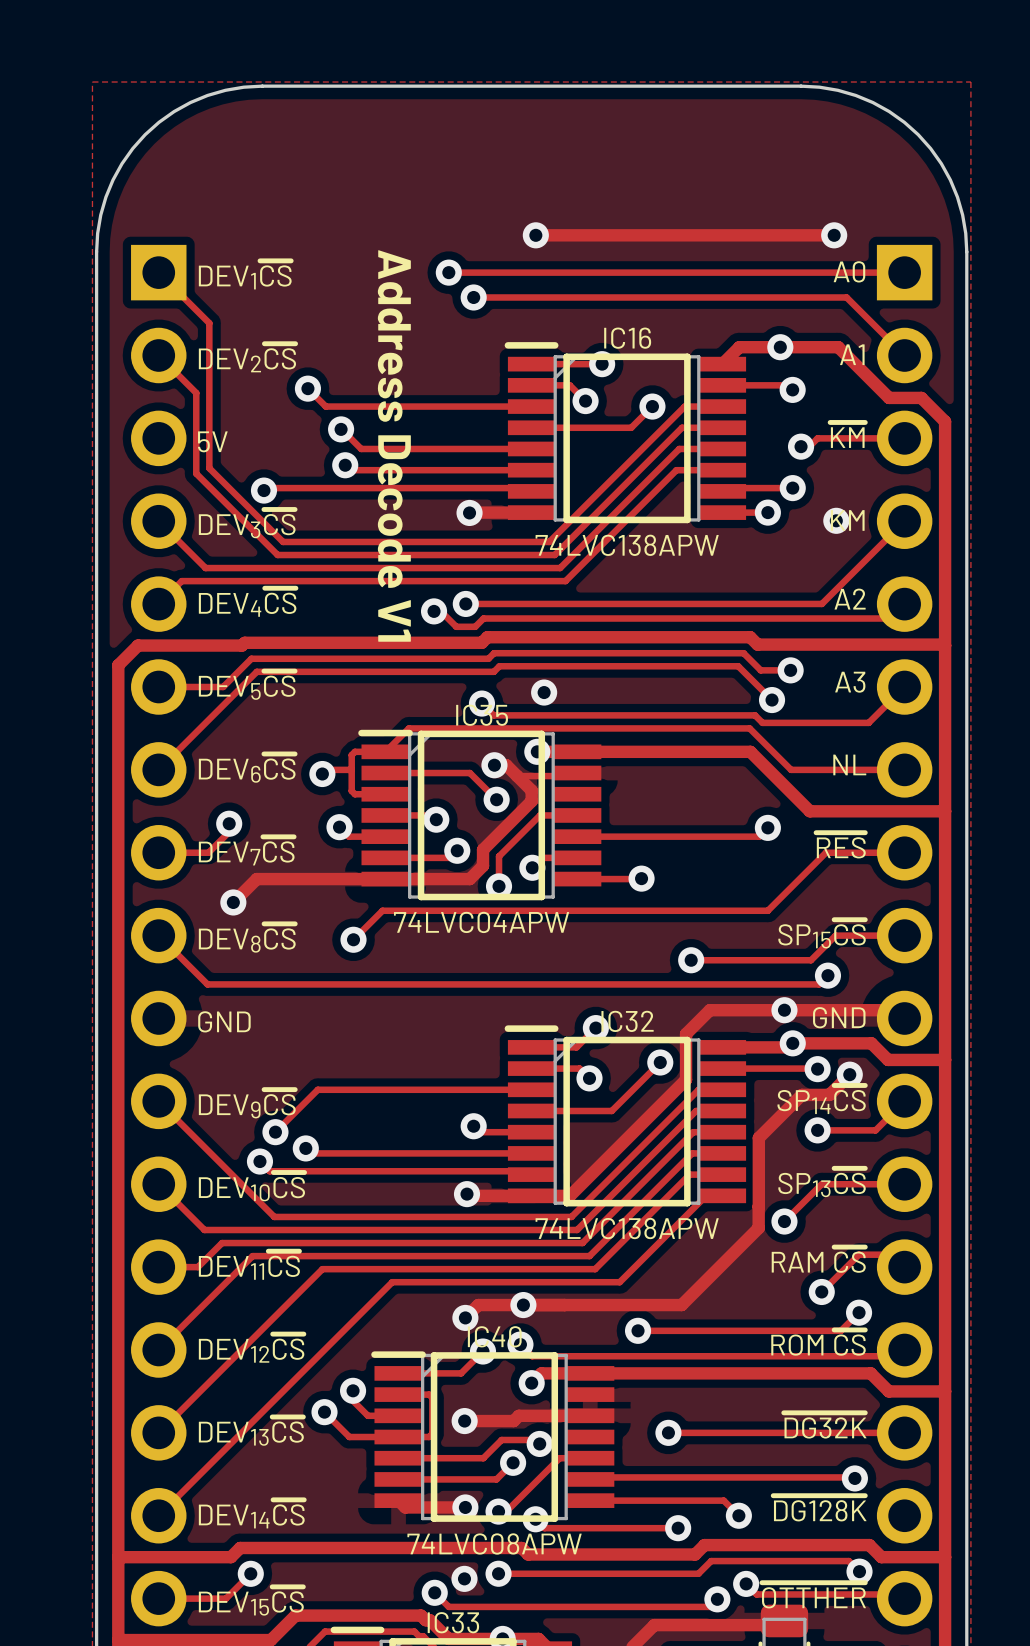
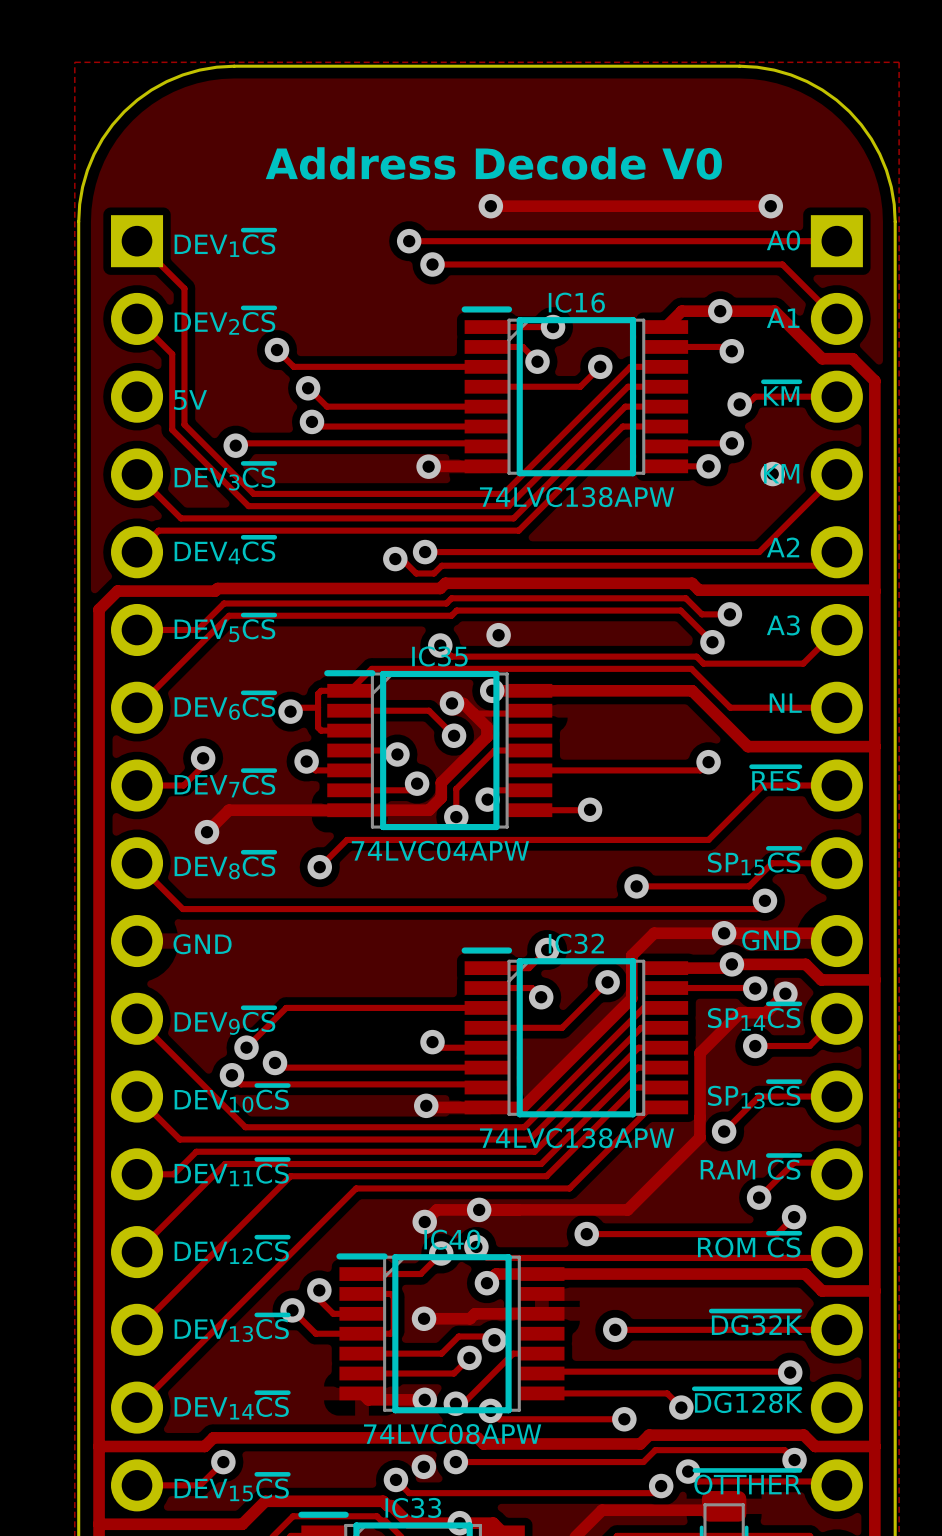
text: Address Decode V1 (394, 445) -> Address Decode V0 (493, 163)

